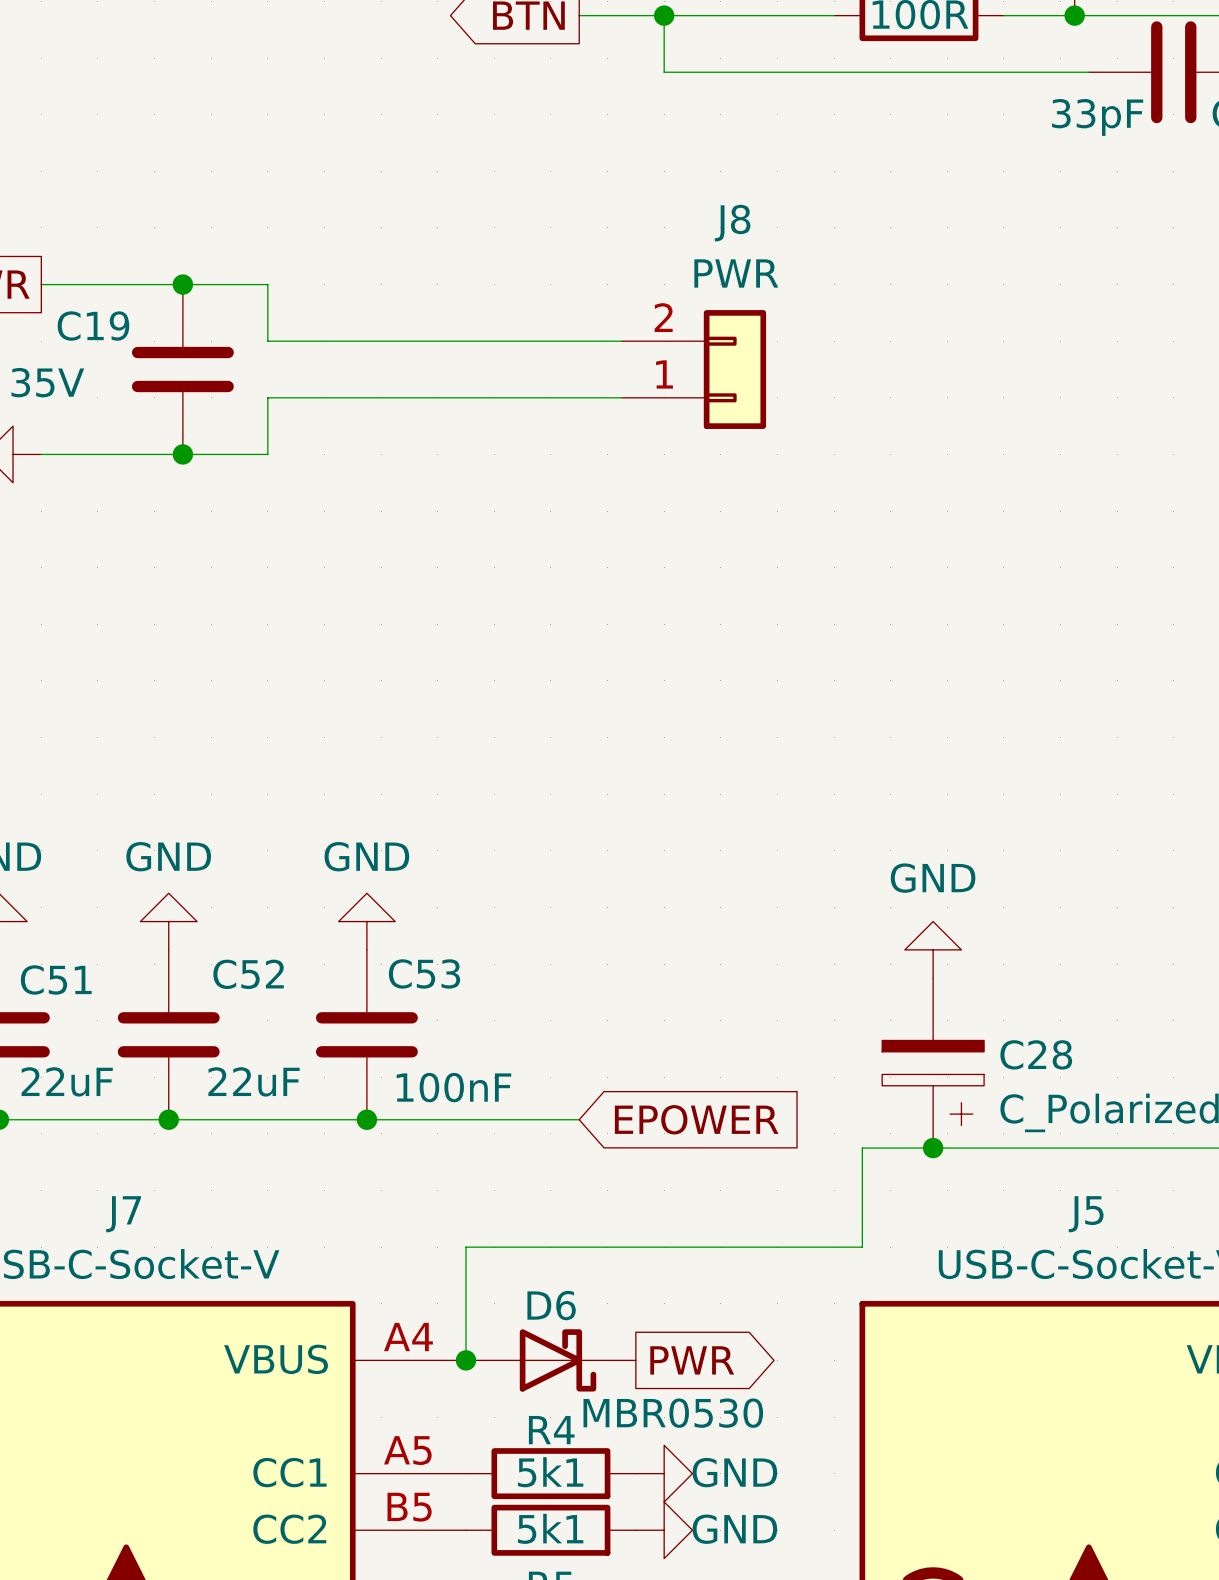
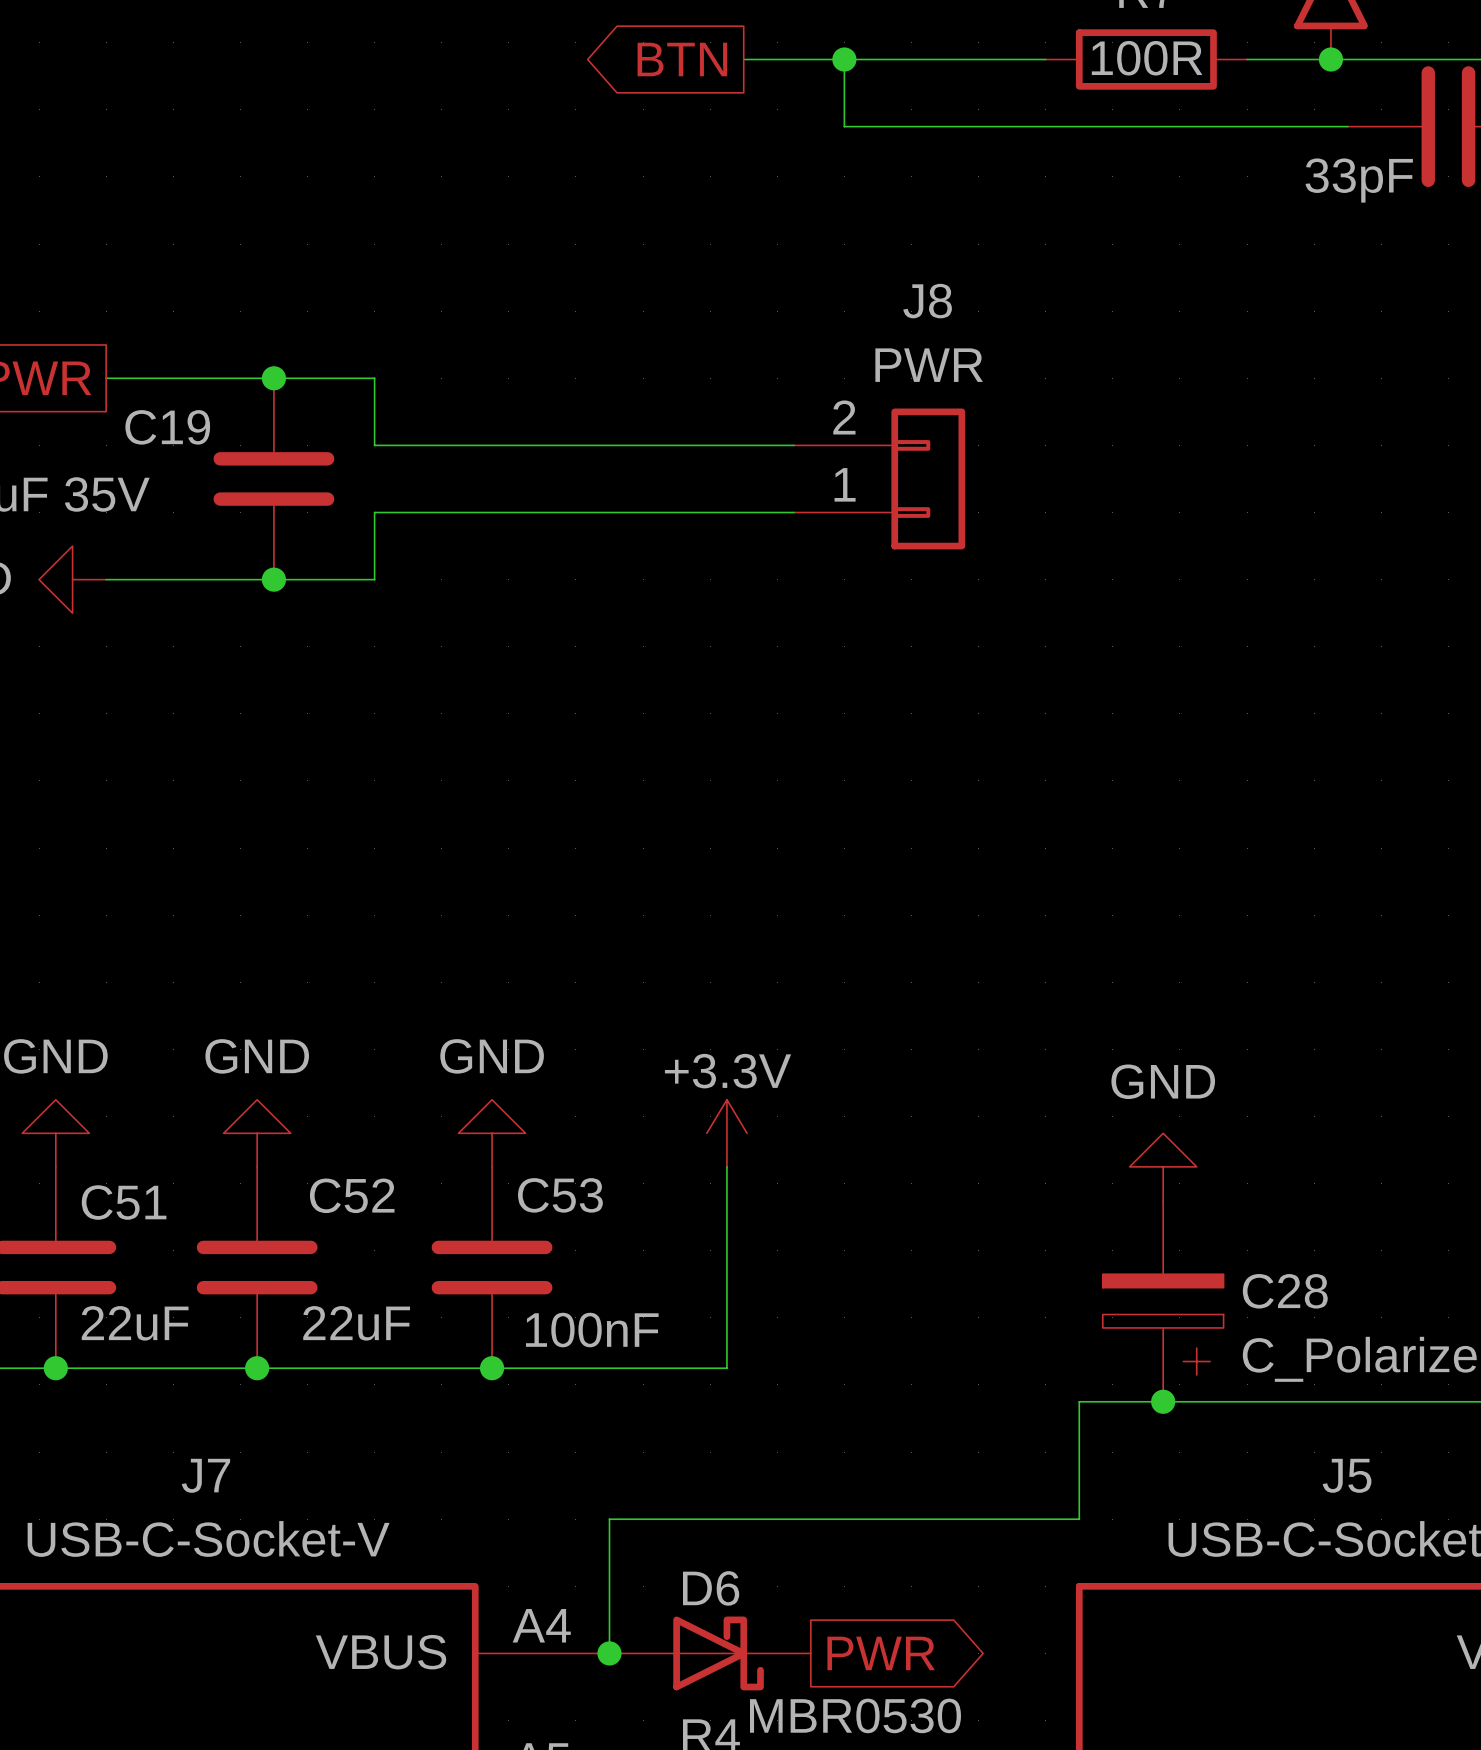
power symbol: none -> +3.3V (726, 1133)
wire: (565, 1119) (579, 1119) -> (726, 1368) (726, 1166)
global label: EPOWER (696, 1119) -> none

